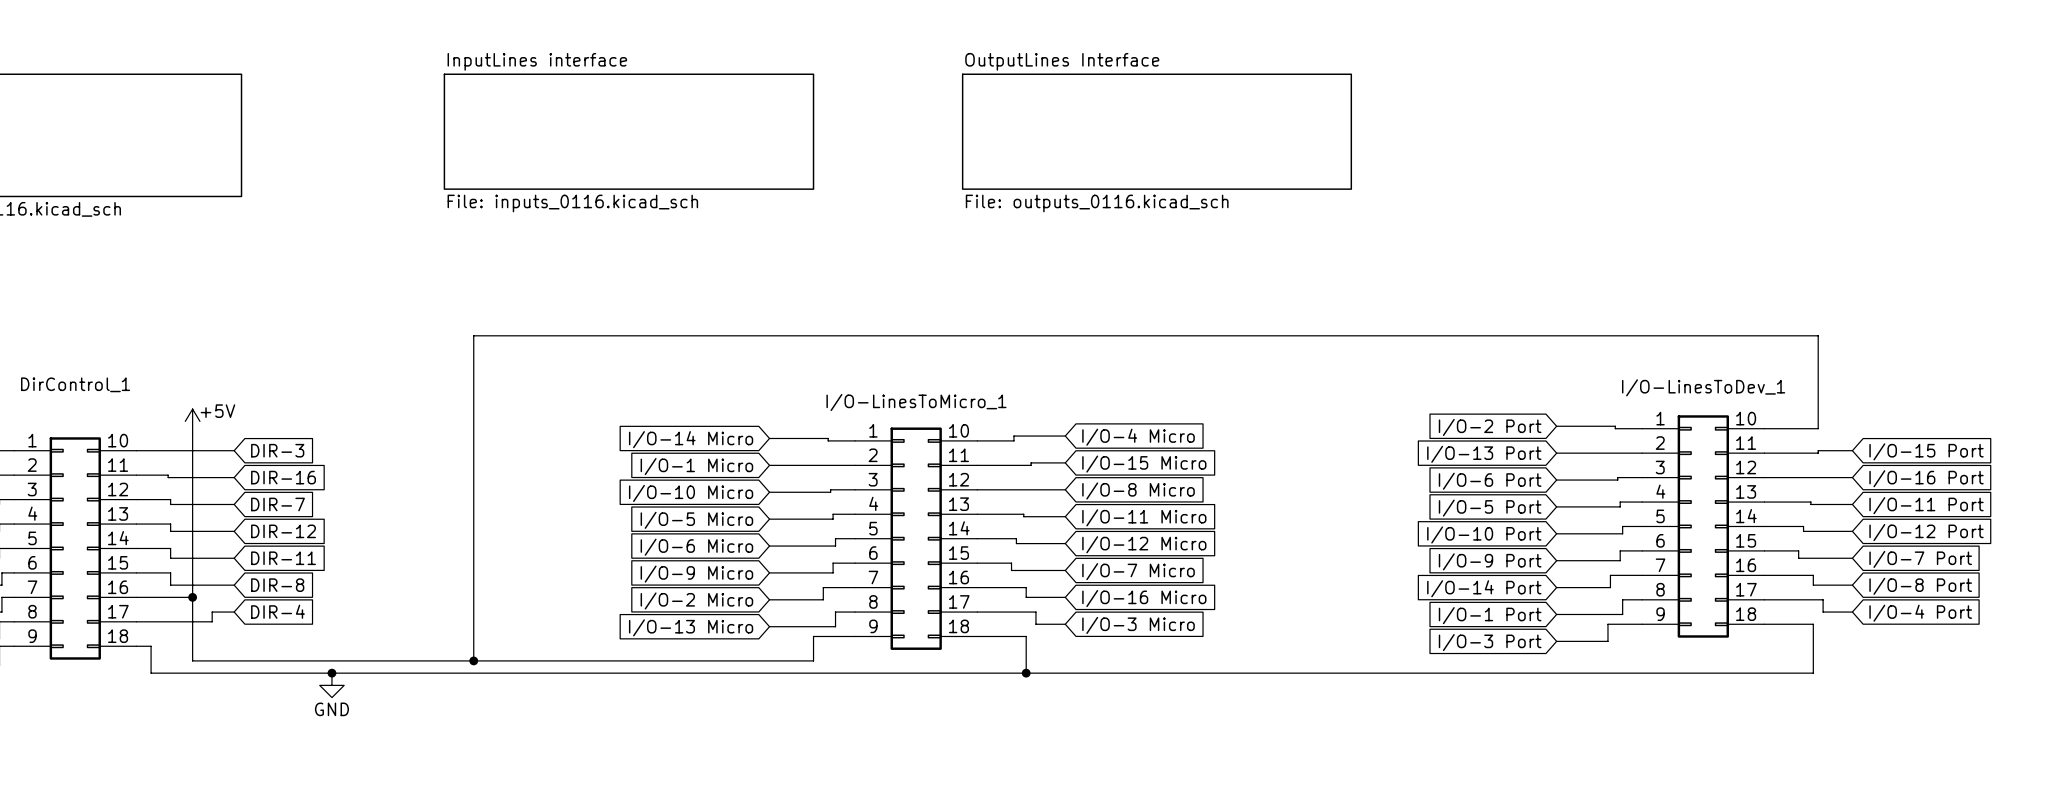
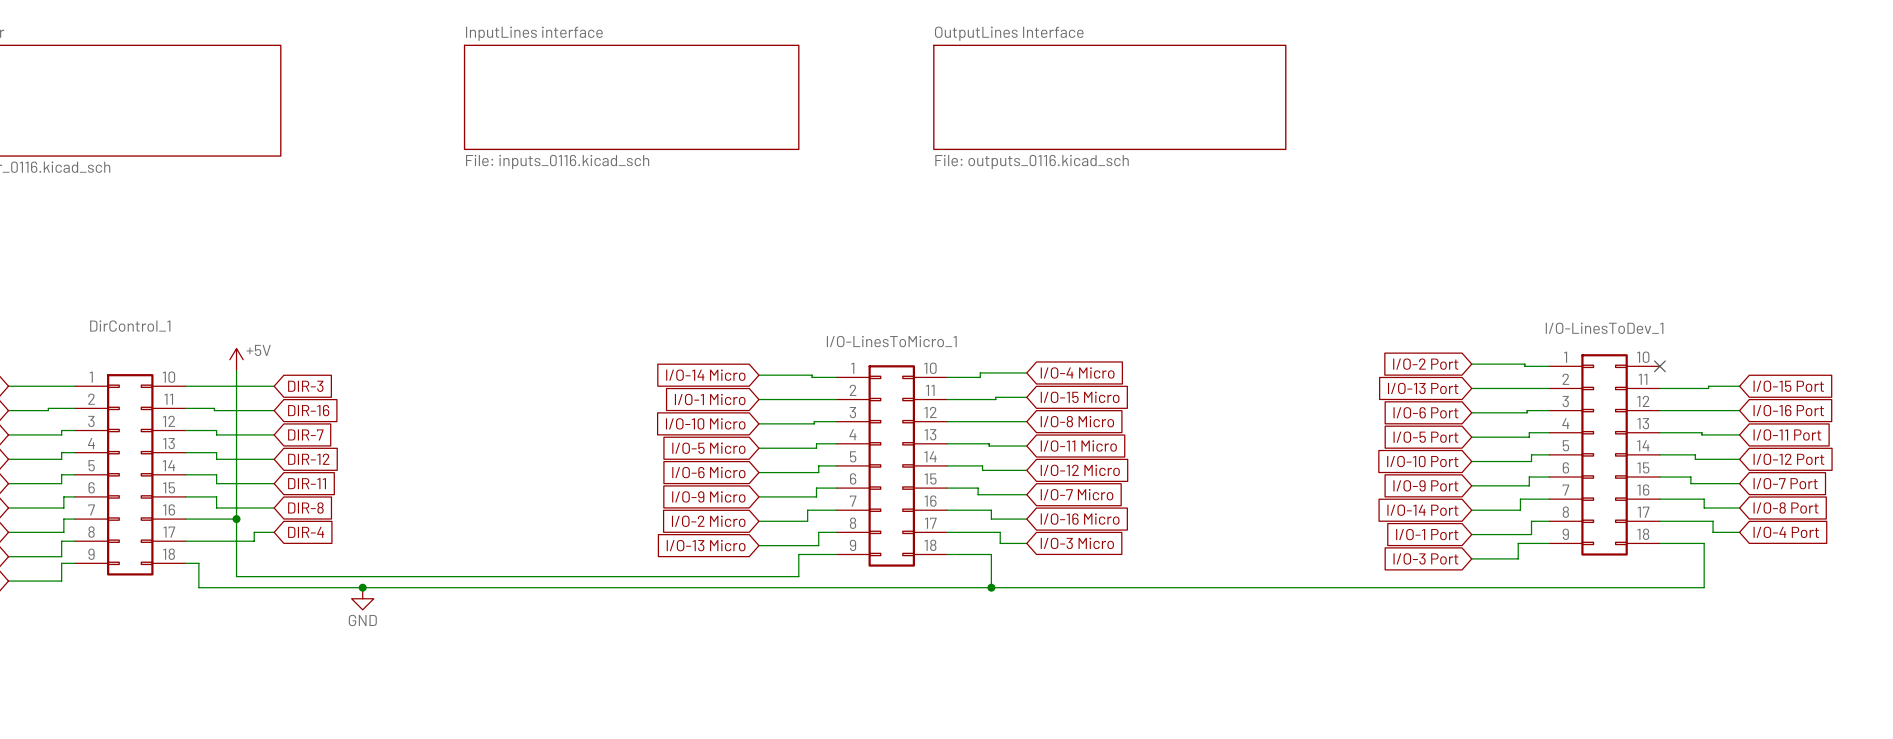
wire: (1764, 428) (1818, 428) (1818, 335) (473, 335) (473, 660) -> none
no-connect mark: none -> (1659, 366)
junction: (473, 660) -> none

